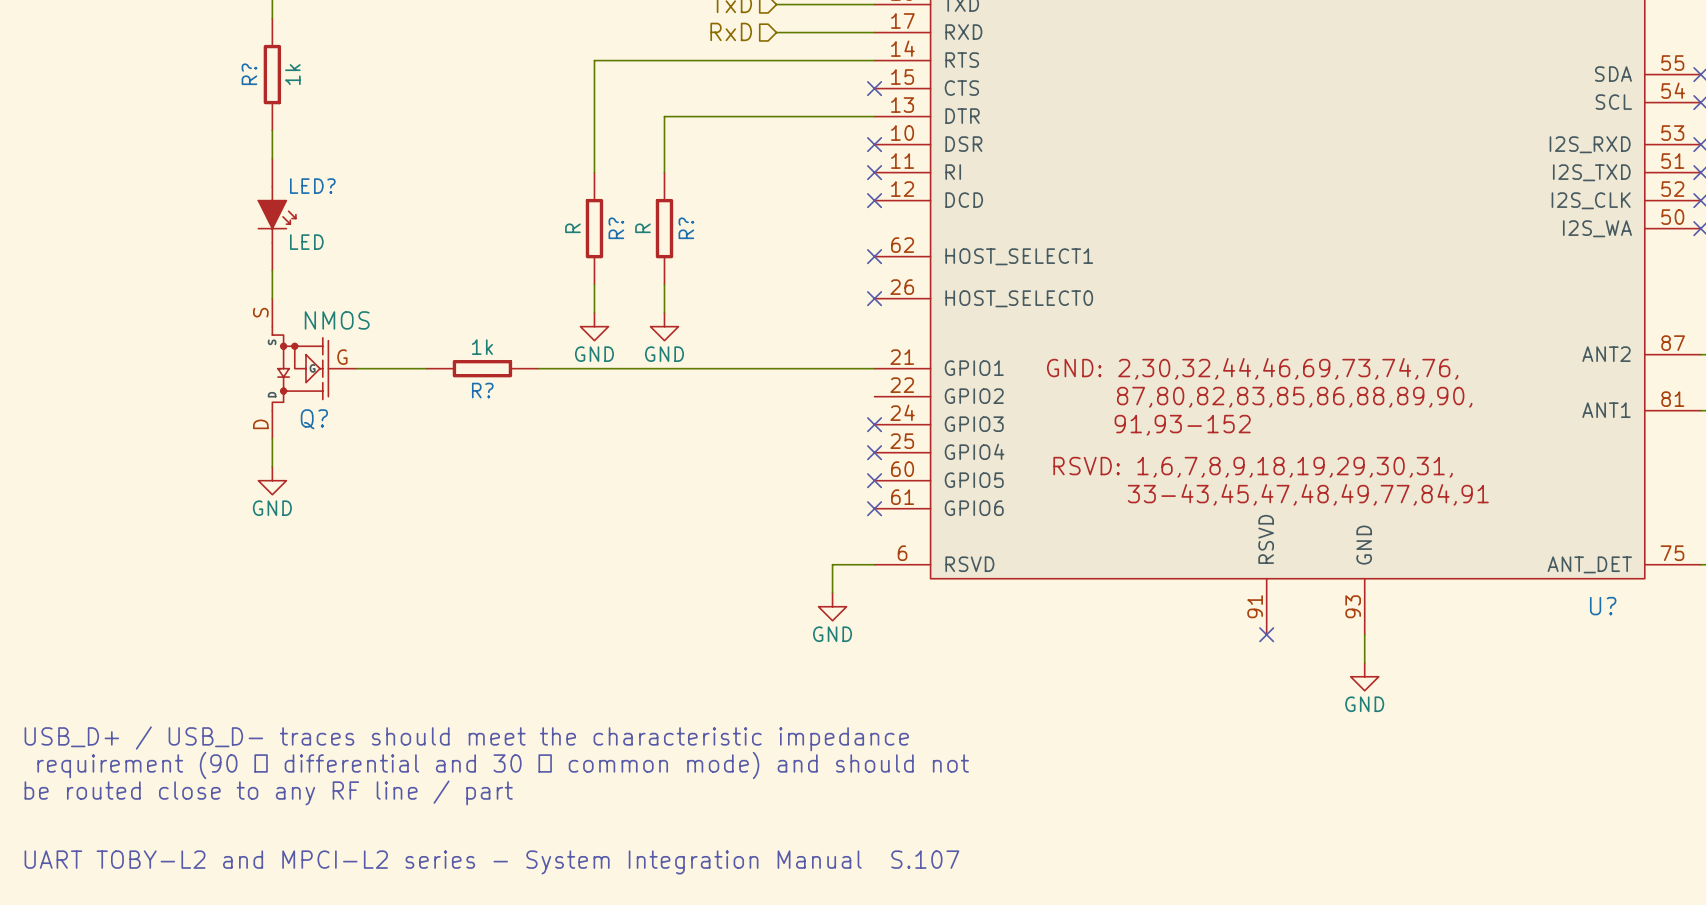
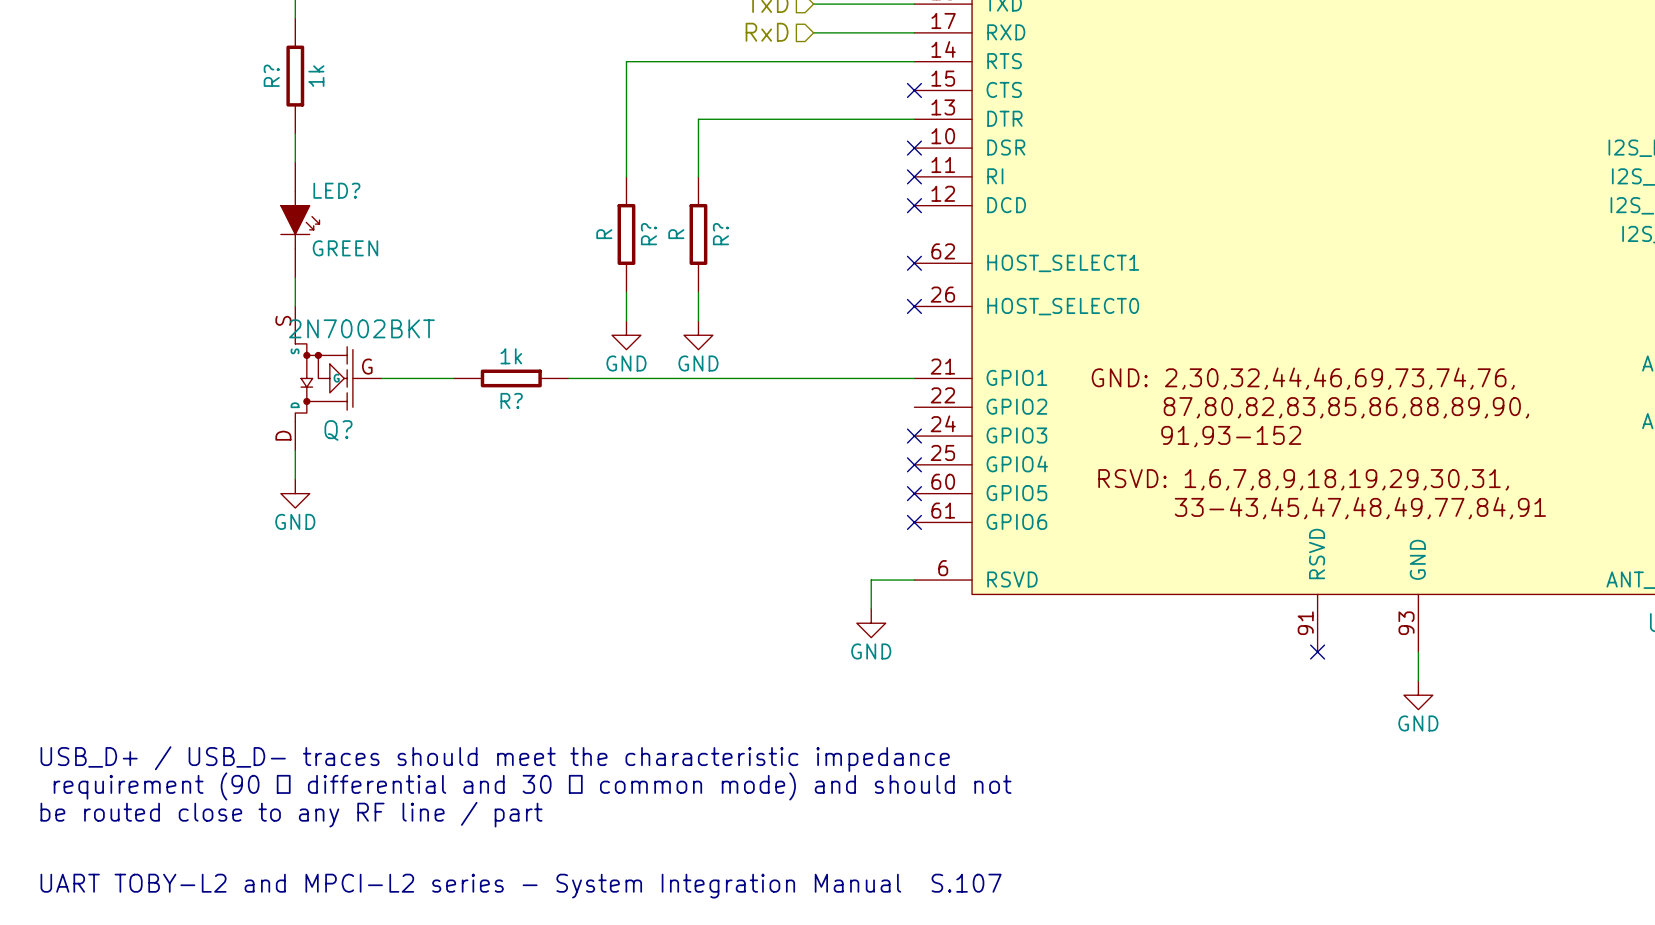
LED? value: LED (306, 242) -> GREEN (345, 248)
Q? value: NMOS (337, 320) -> 2N7002BKT (361, 328)

